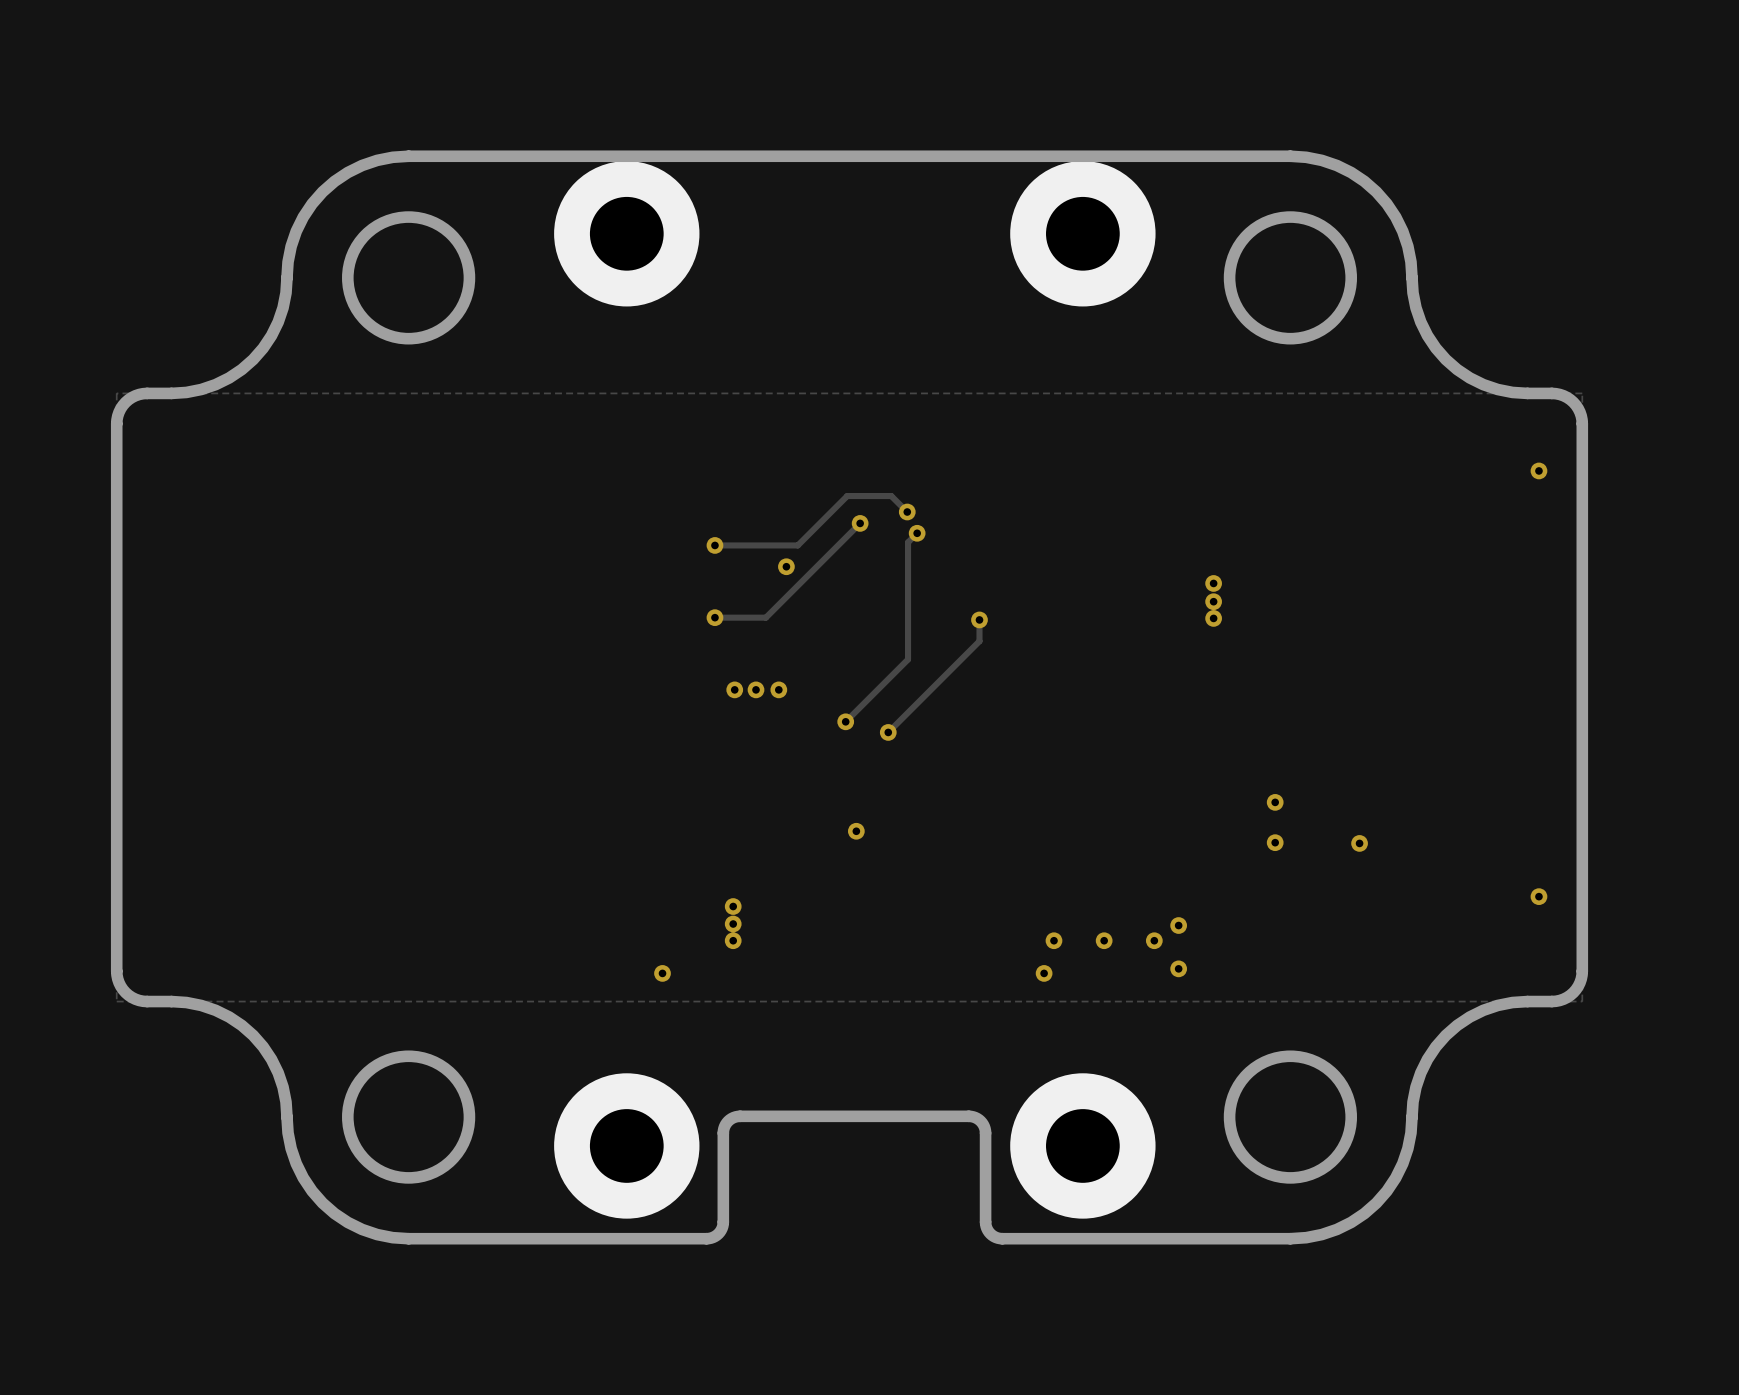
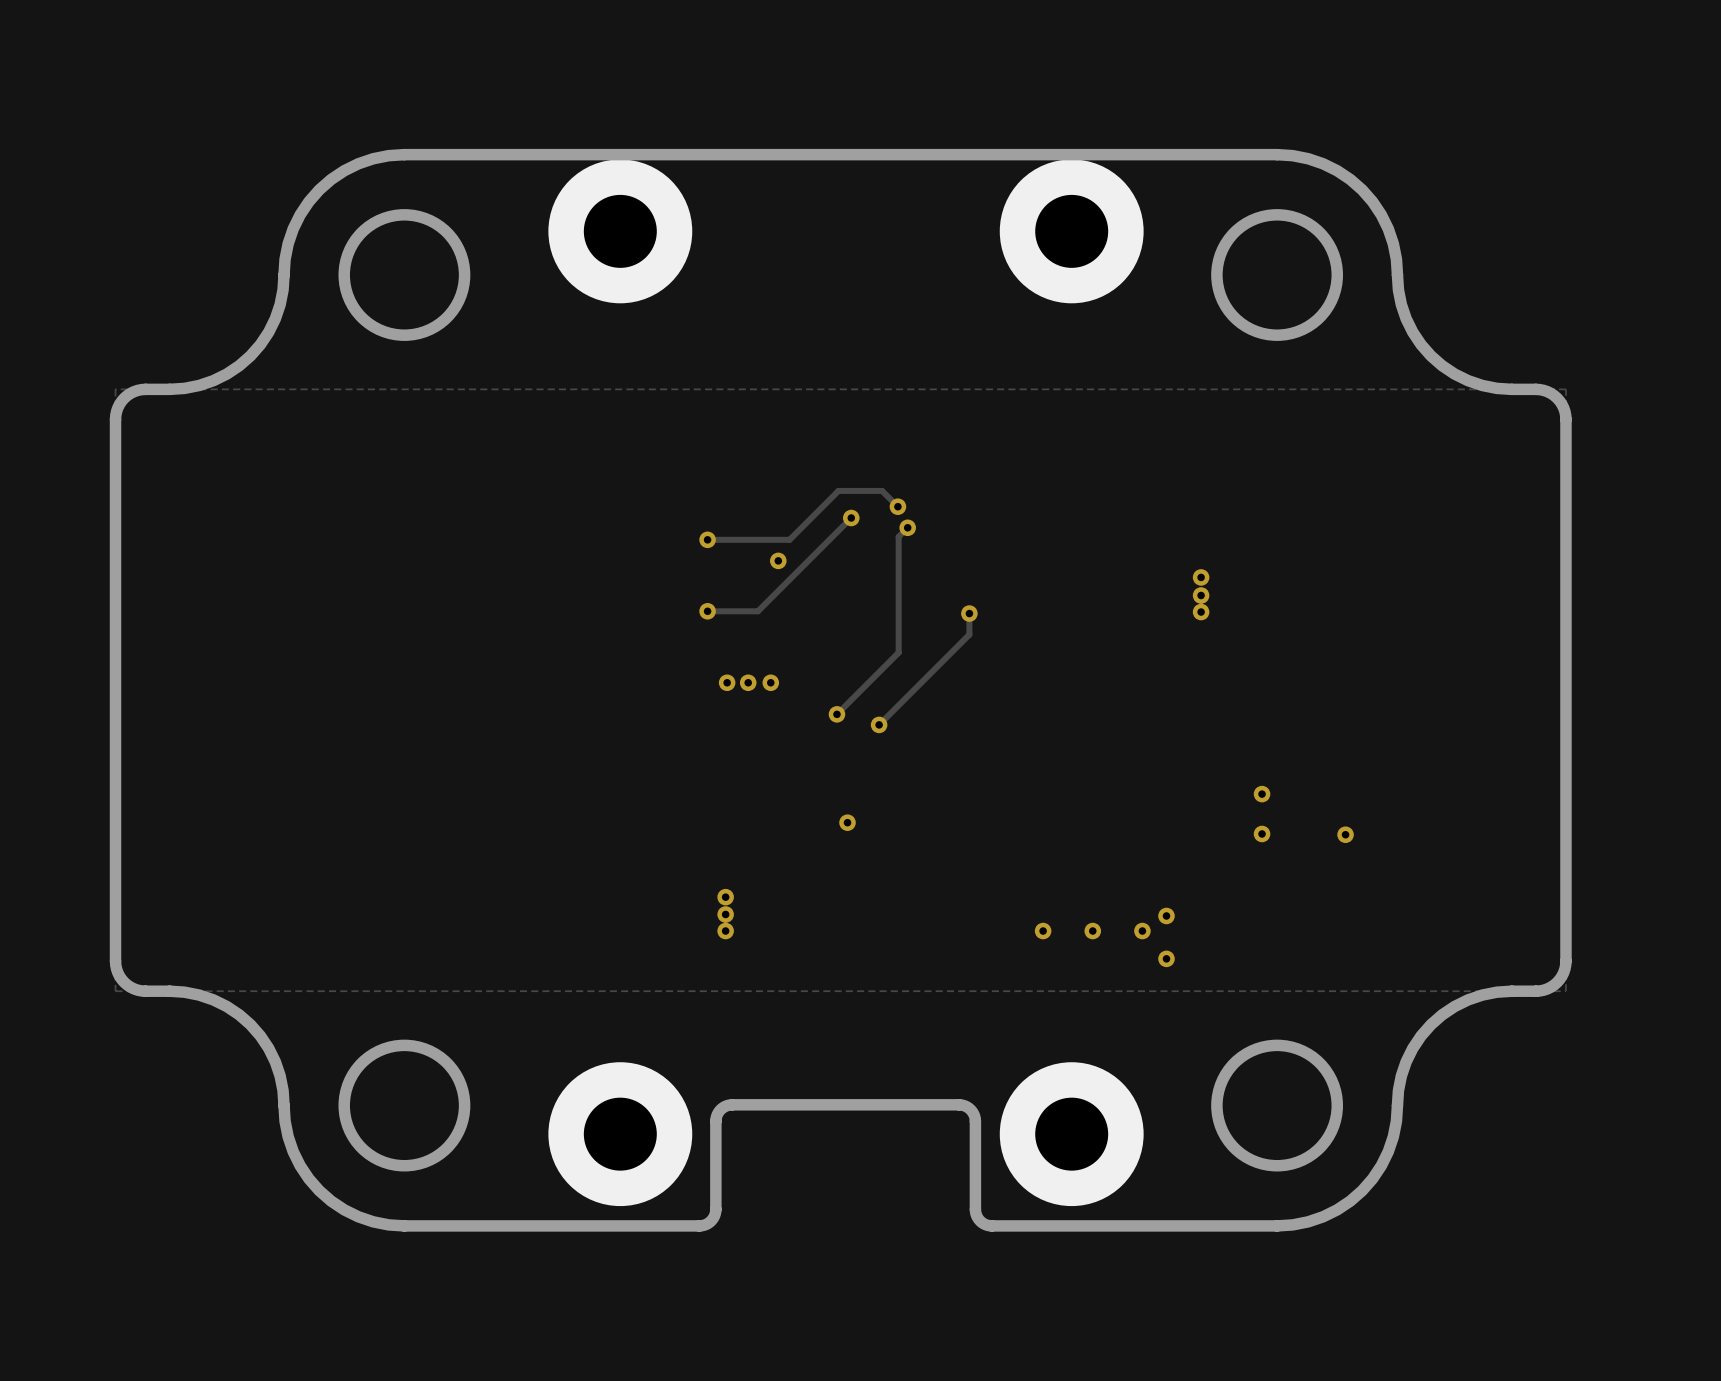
via: (1538, 470) -> none
via: (1538, 896) -> none
via: (662, 973) -> none
via: (1044, 973) -> none

